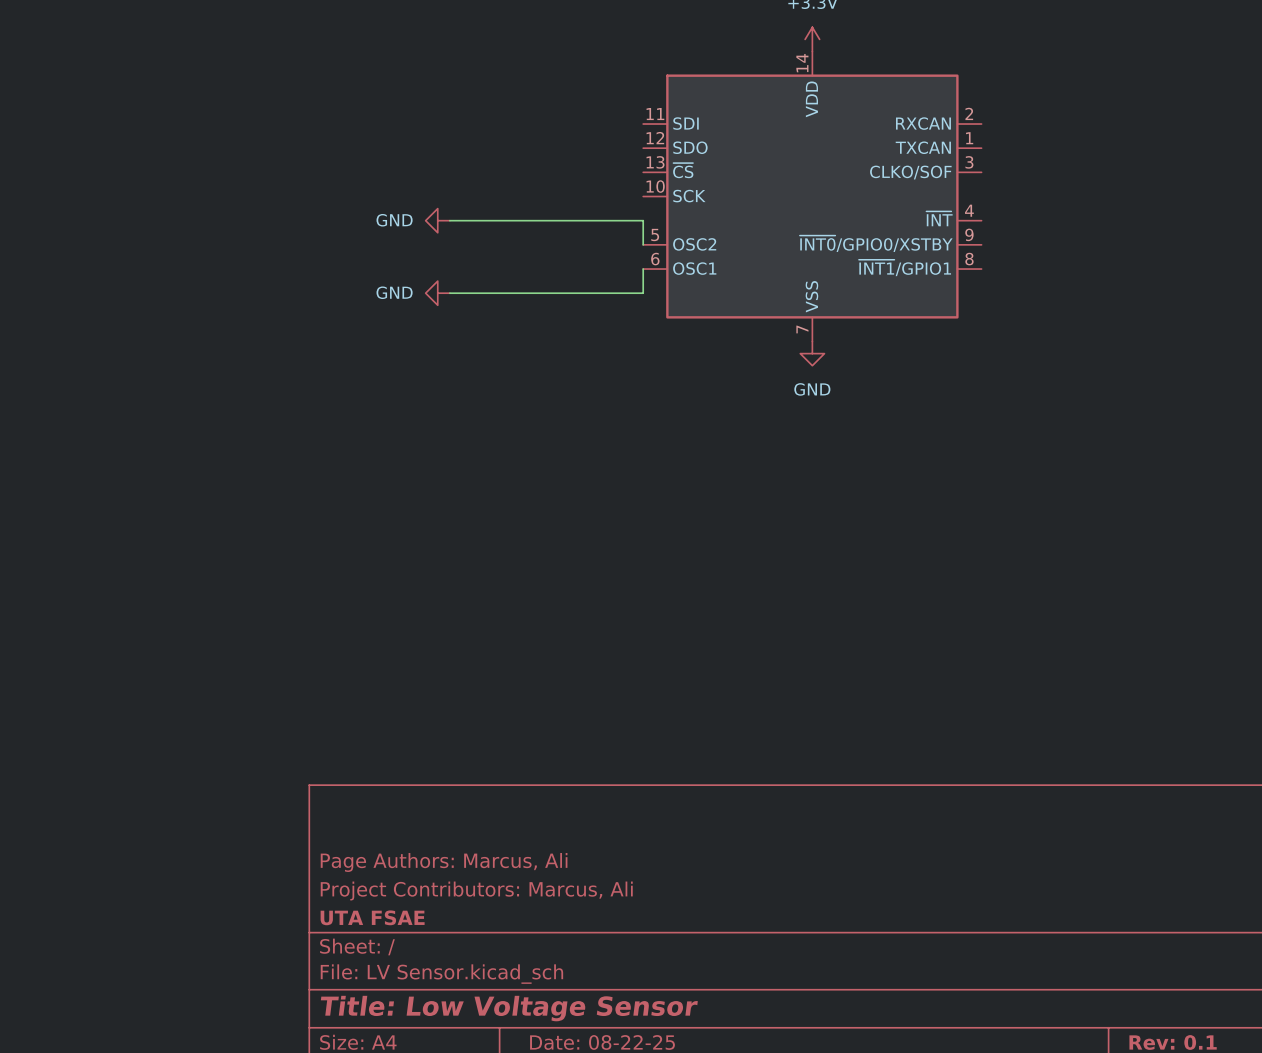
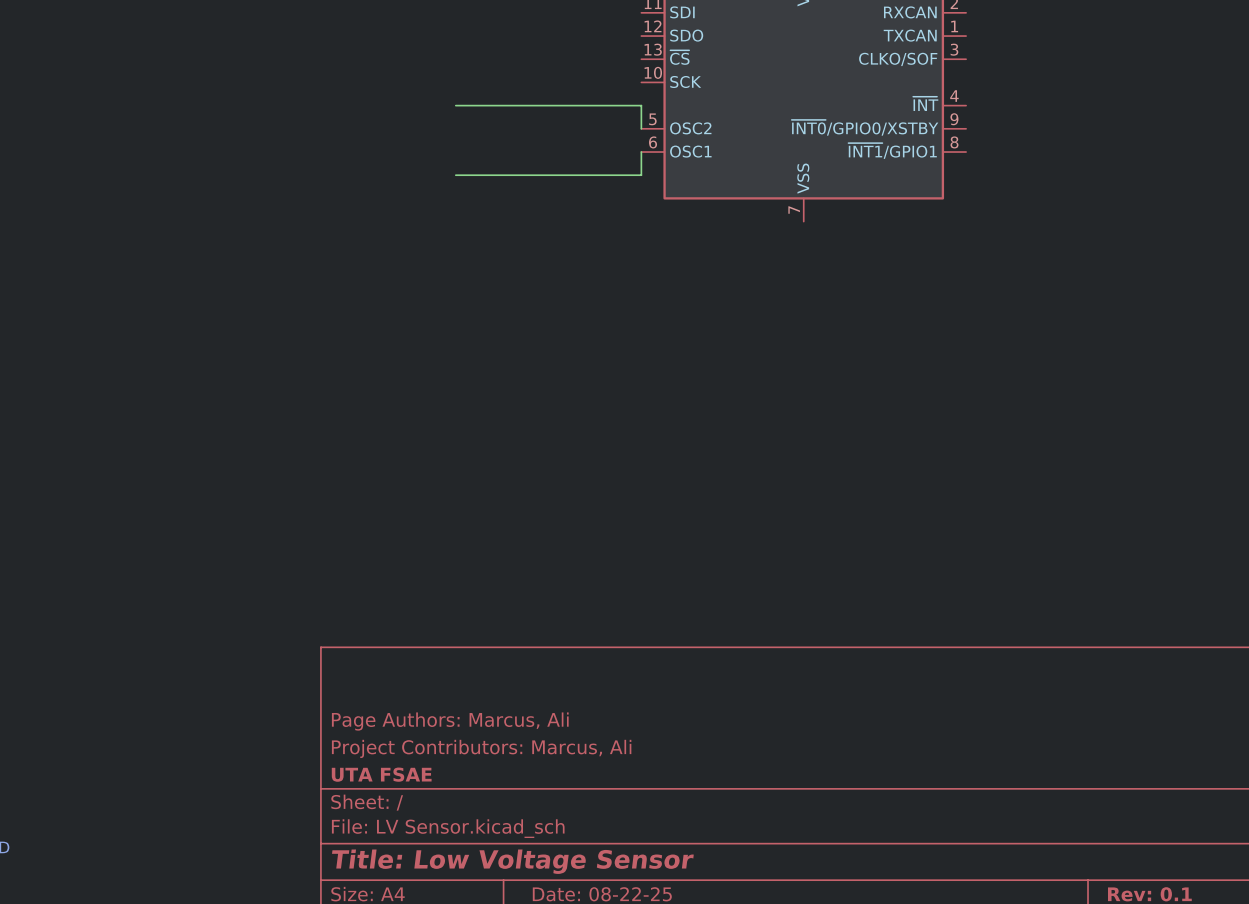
power symbol: GND (437, 220) -> none
power symbol: GND (437, 293) -> none
power symbol: GND (812, 353) -> none

